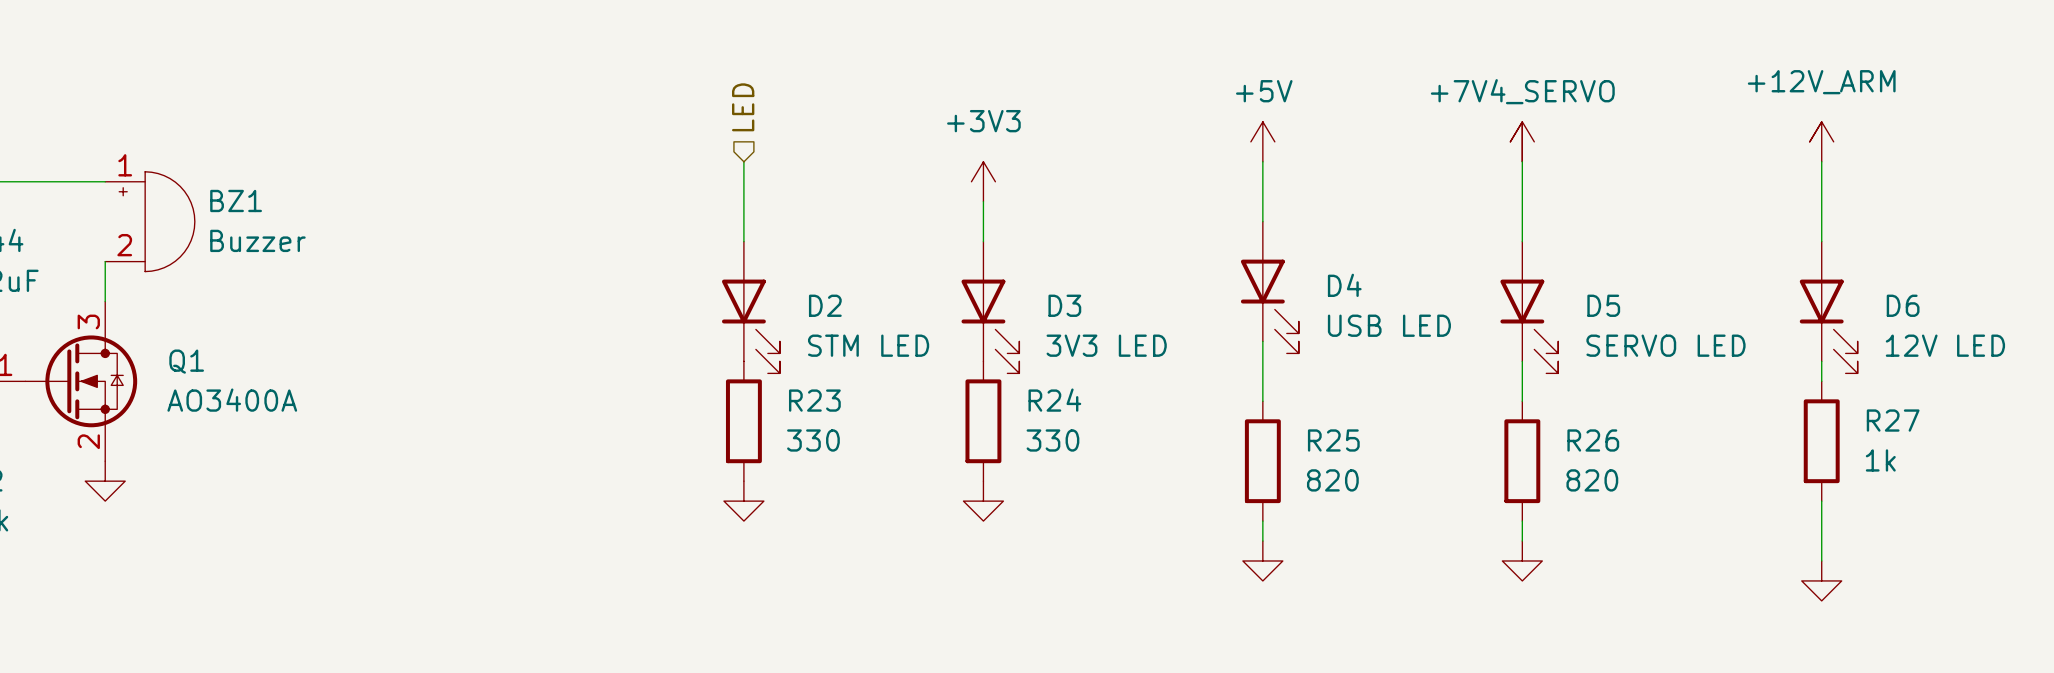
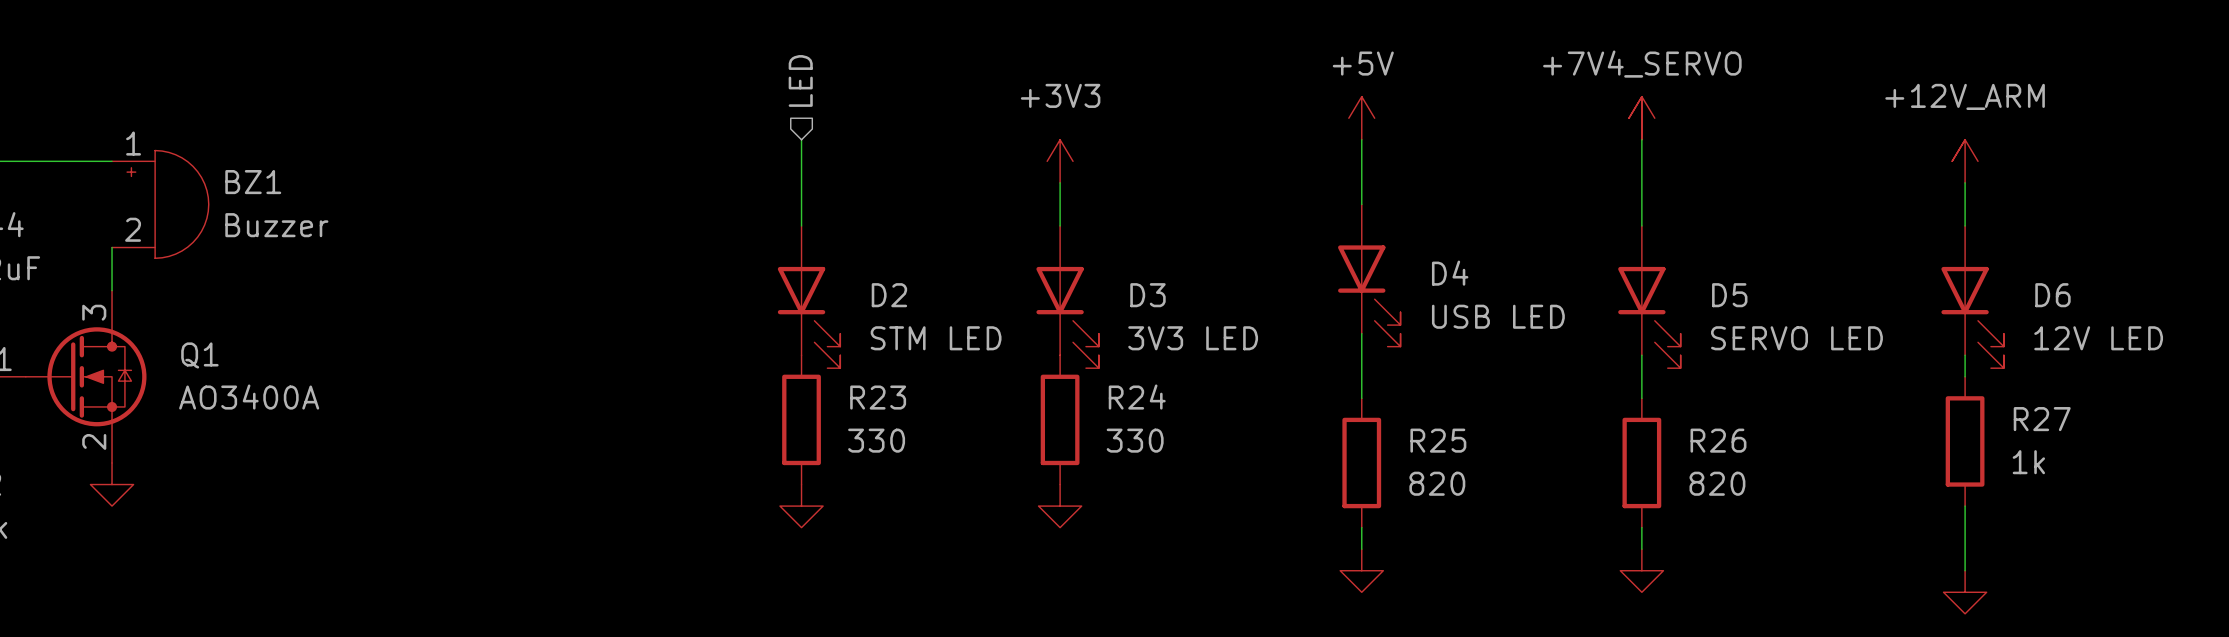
power symbol position: +12V_ARM (1821, 141) -> +12V_ARM (1965, 161)

